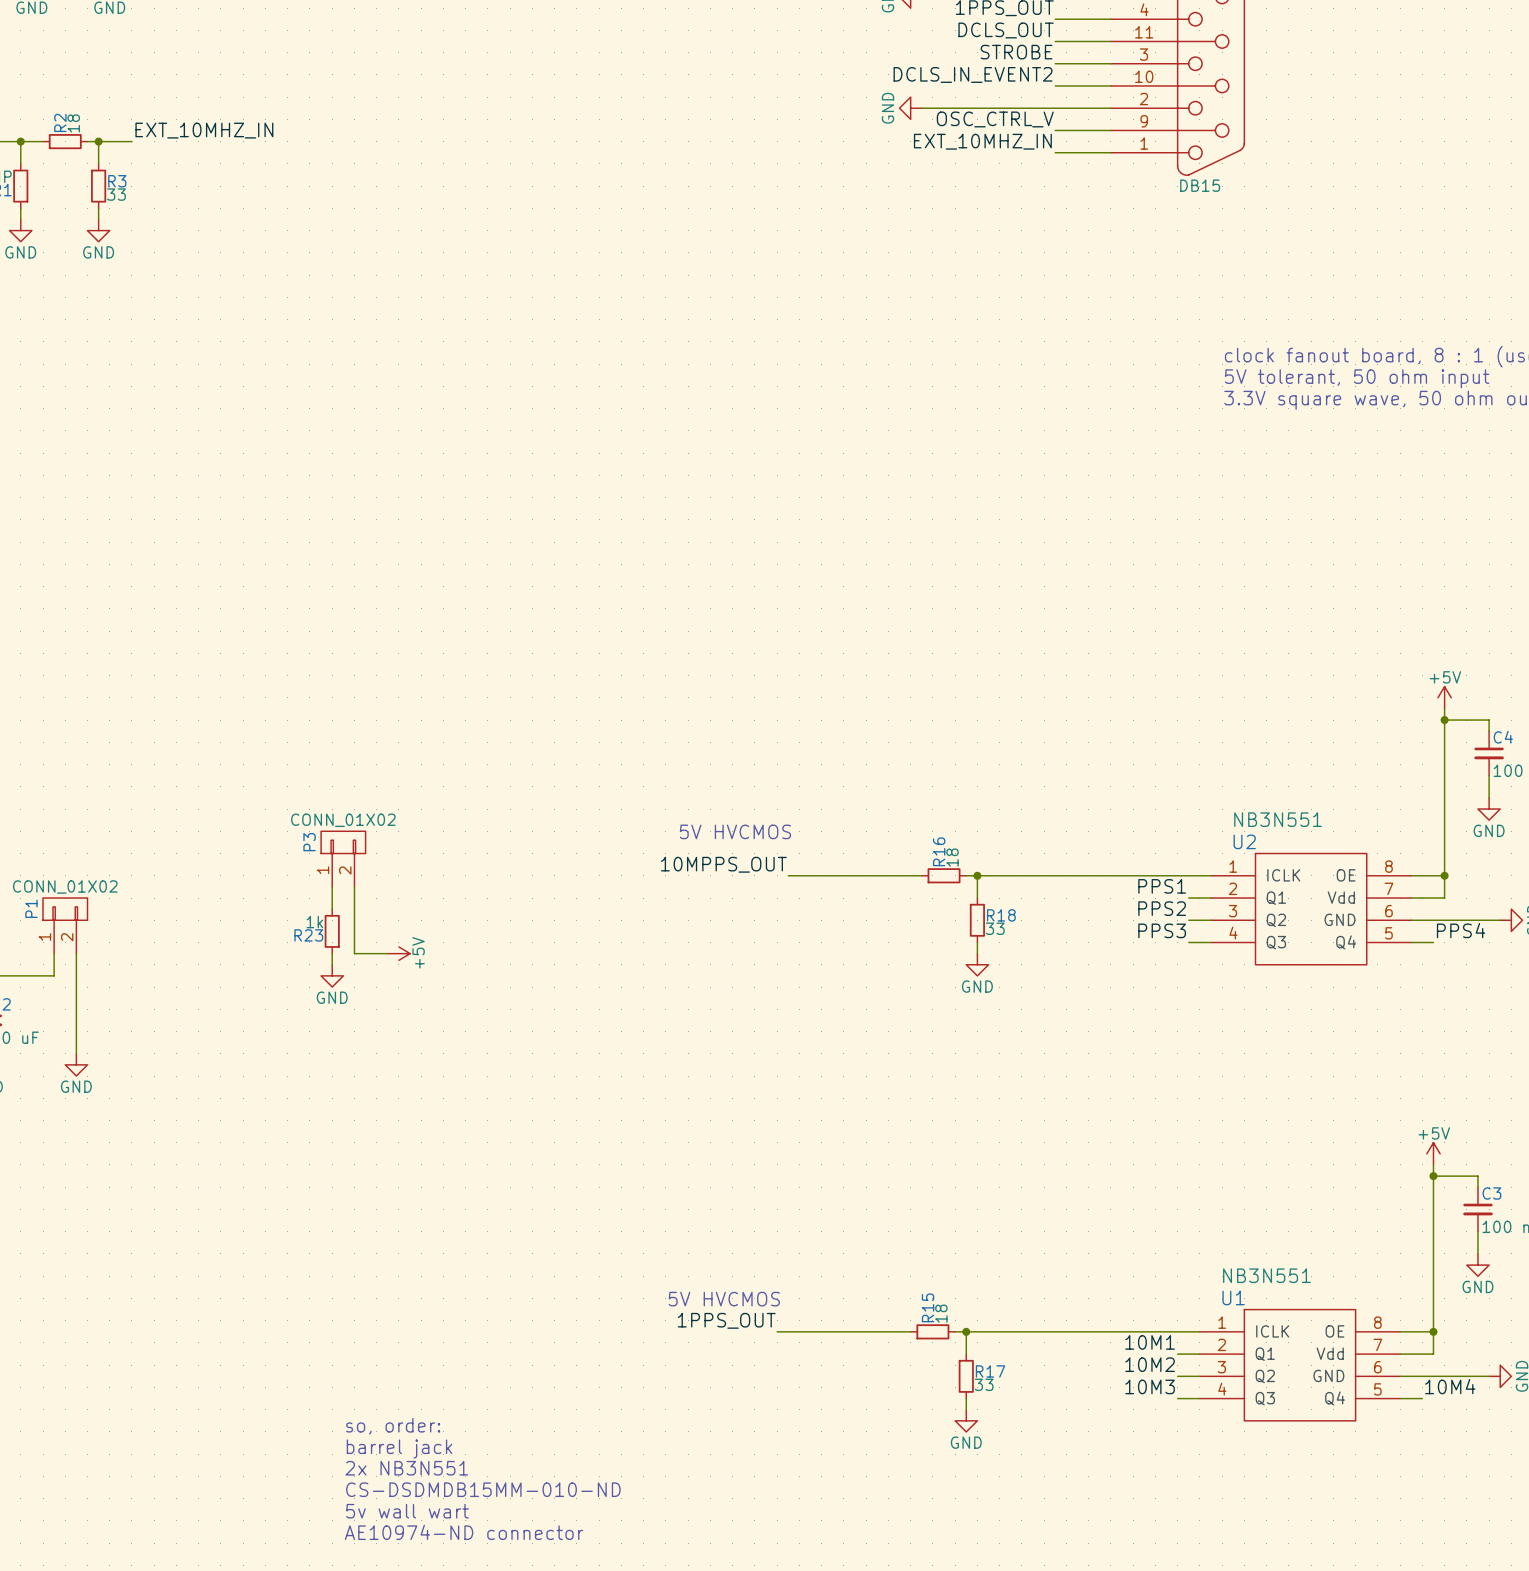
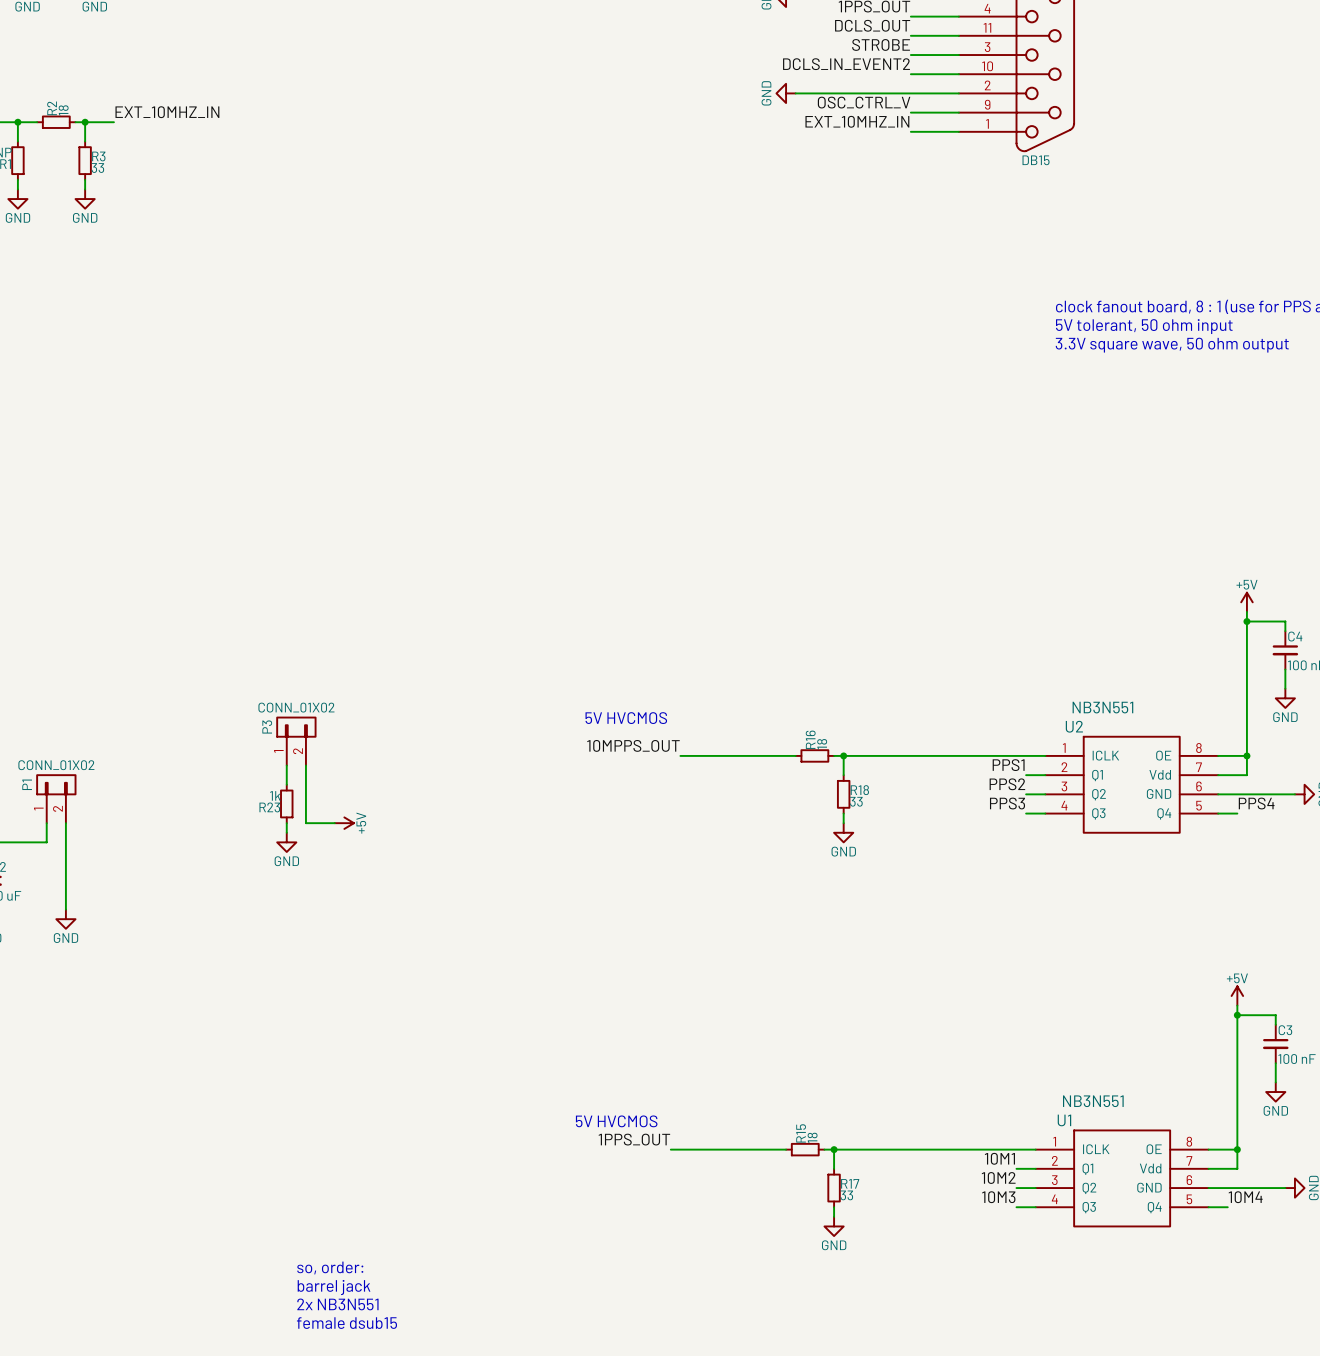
text: so, order: (393, 1426) -> none
text: barrel jack (399, 1448) -> none
text: 2x NB3N551 (406, 1468) -> so, order: (330, 1268)
text: CS-DSDMDB15MM-010-ND (483, 1489) -> barrel jack (334, 1287)
text: 5v wall wart (407, 1511) -> 2x NB3N551 (337, 1304)
text: AE10974-ND connector (464, 1532) -> female dsub15 (346, 1323)

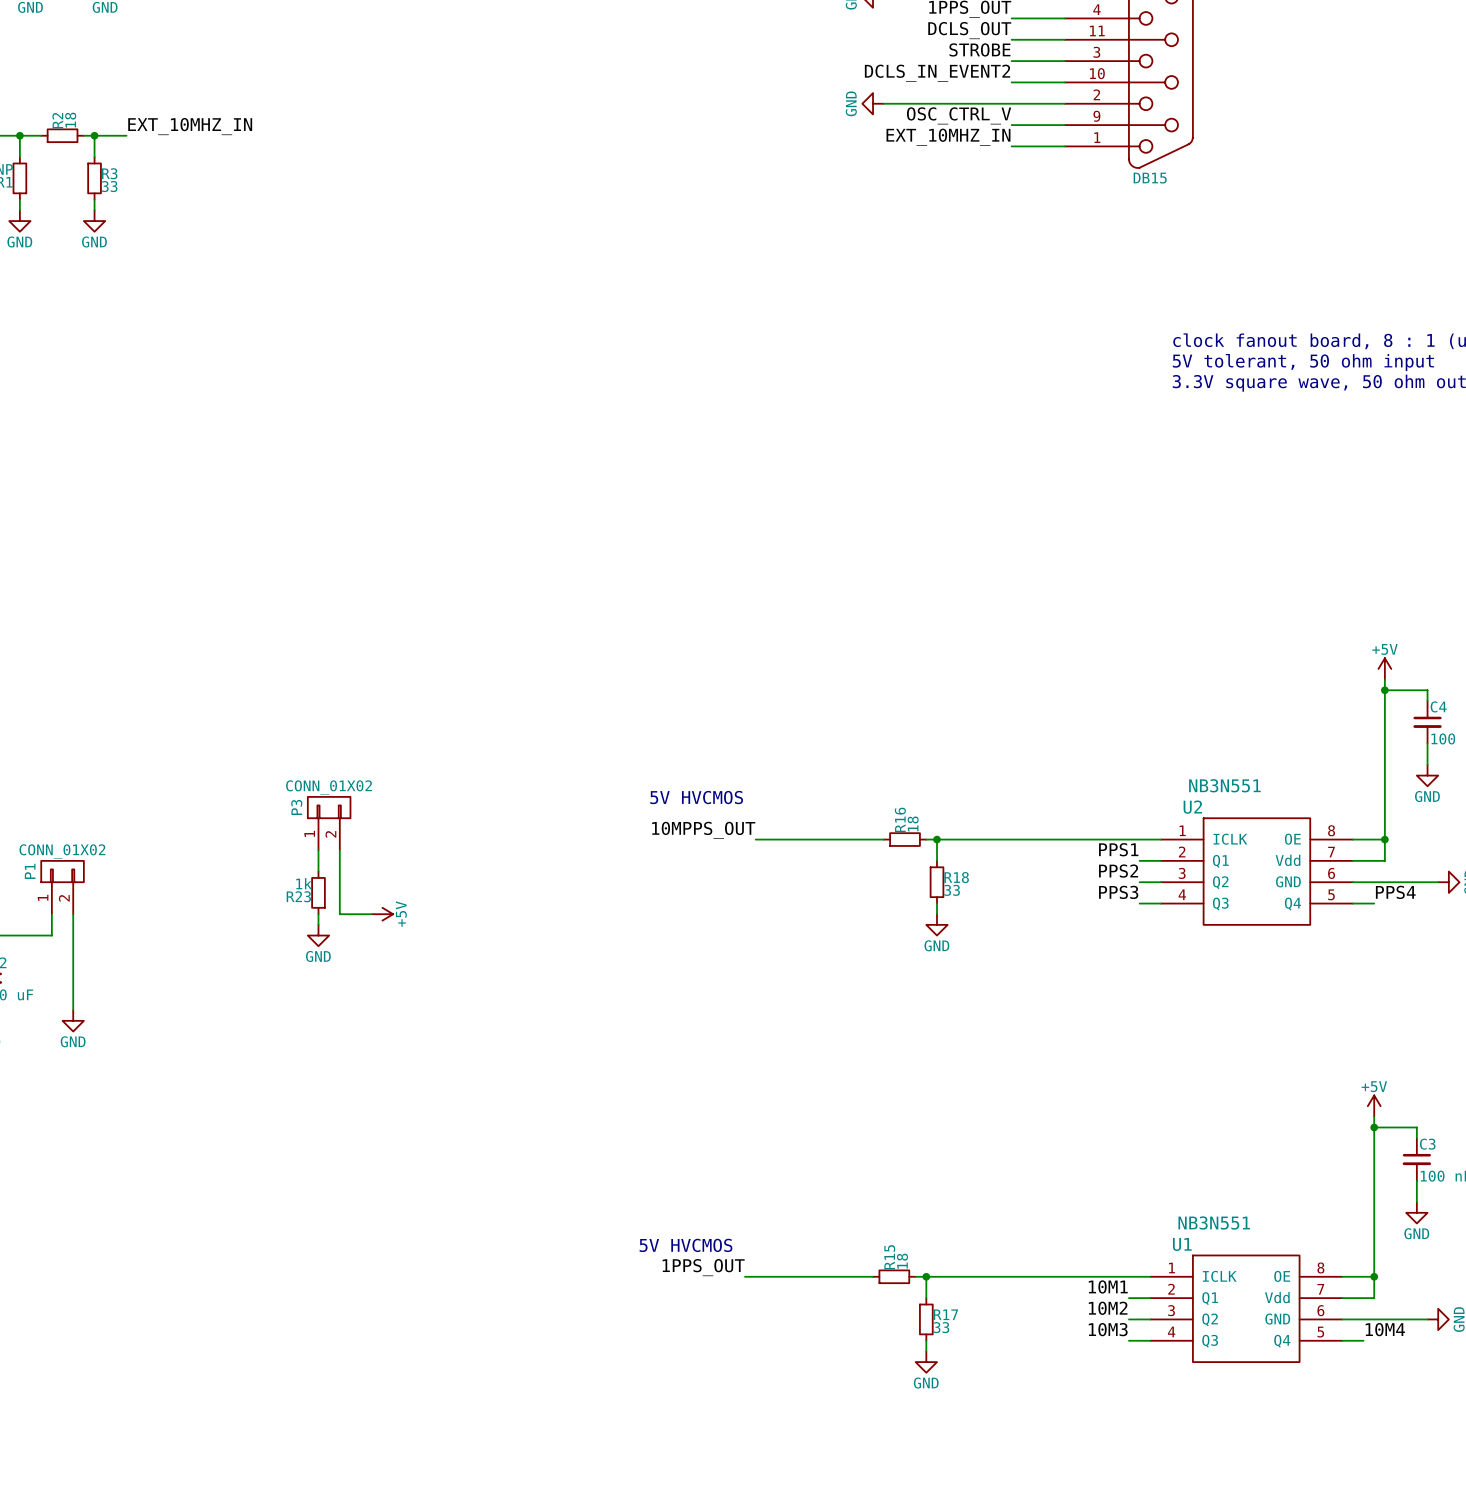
text: so, order: (330, 1268) -> none
text: barrel jack (334, 1287) -> none
text: 2x NB3N551 (337, 1304) -> none
text: female dsub15 (346, 1323) -> none

